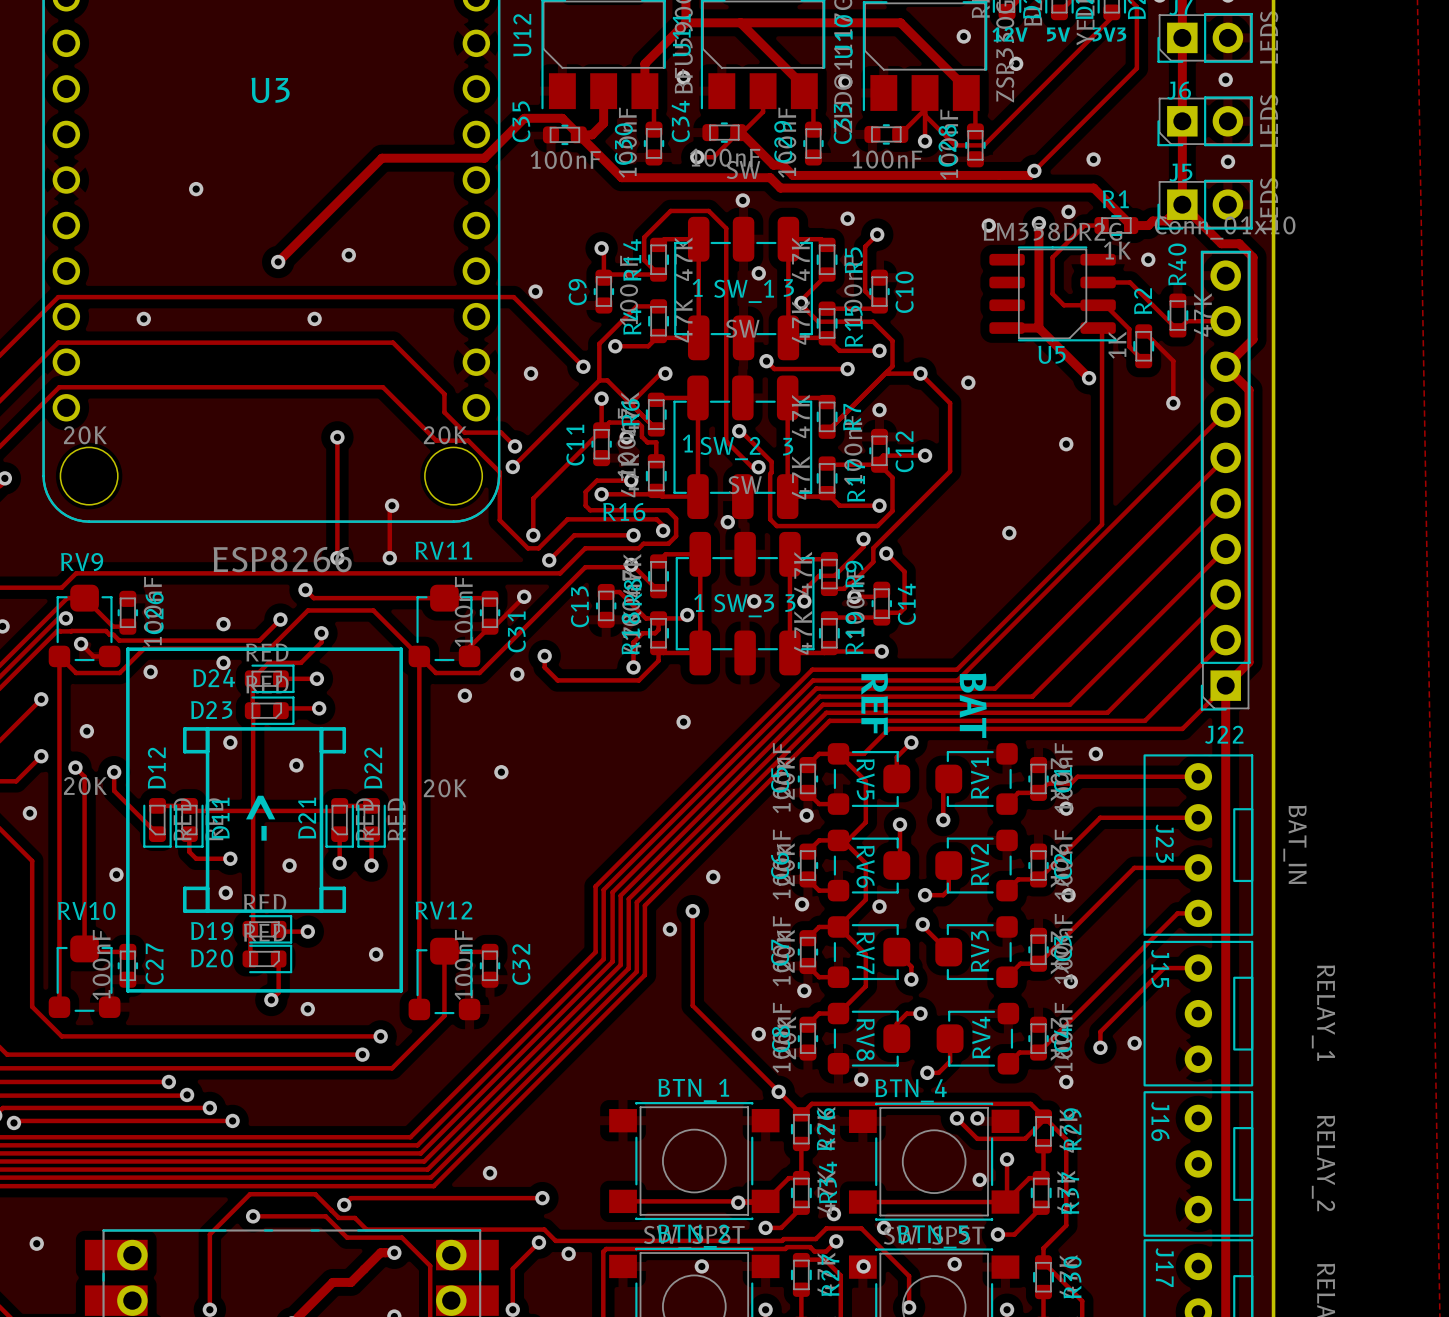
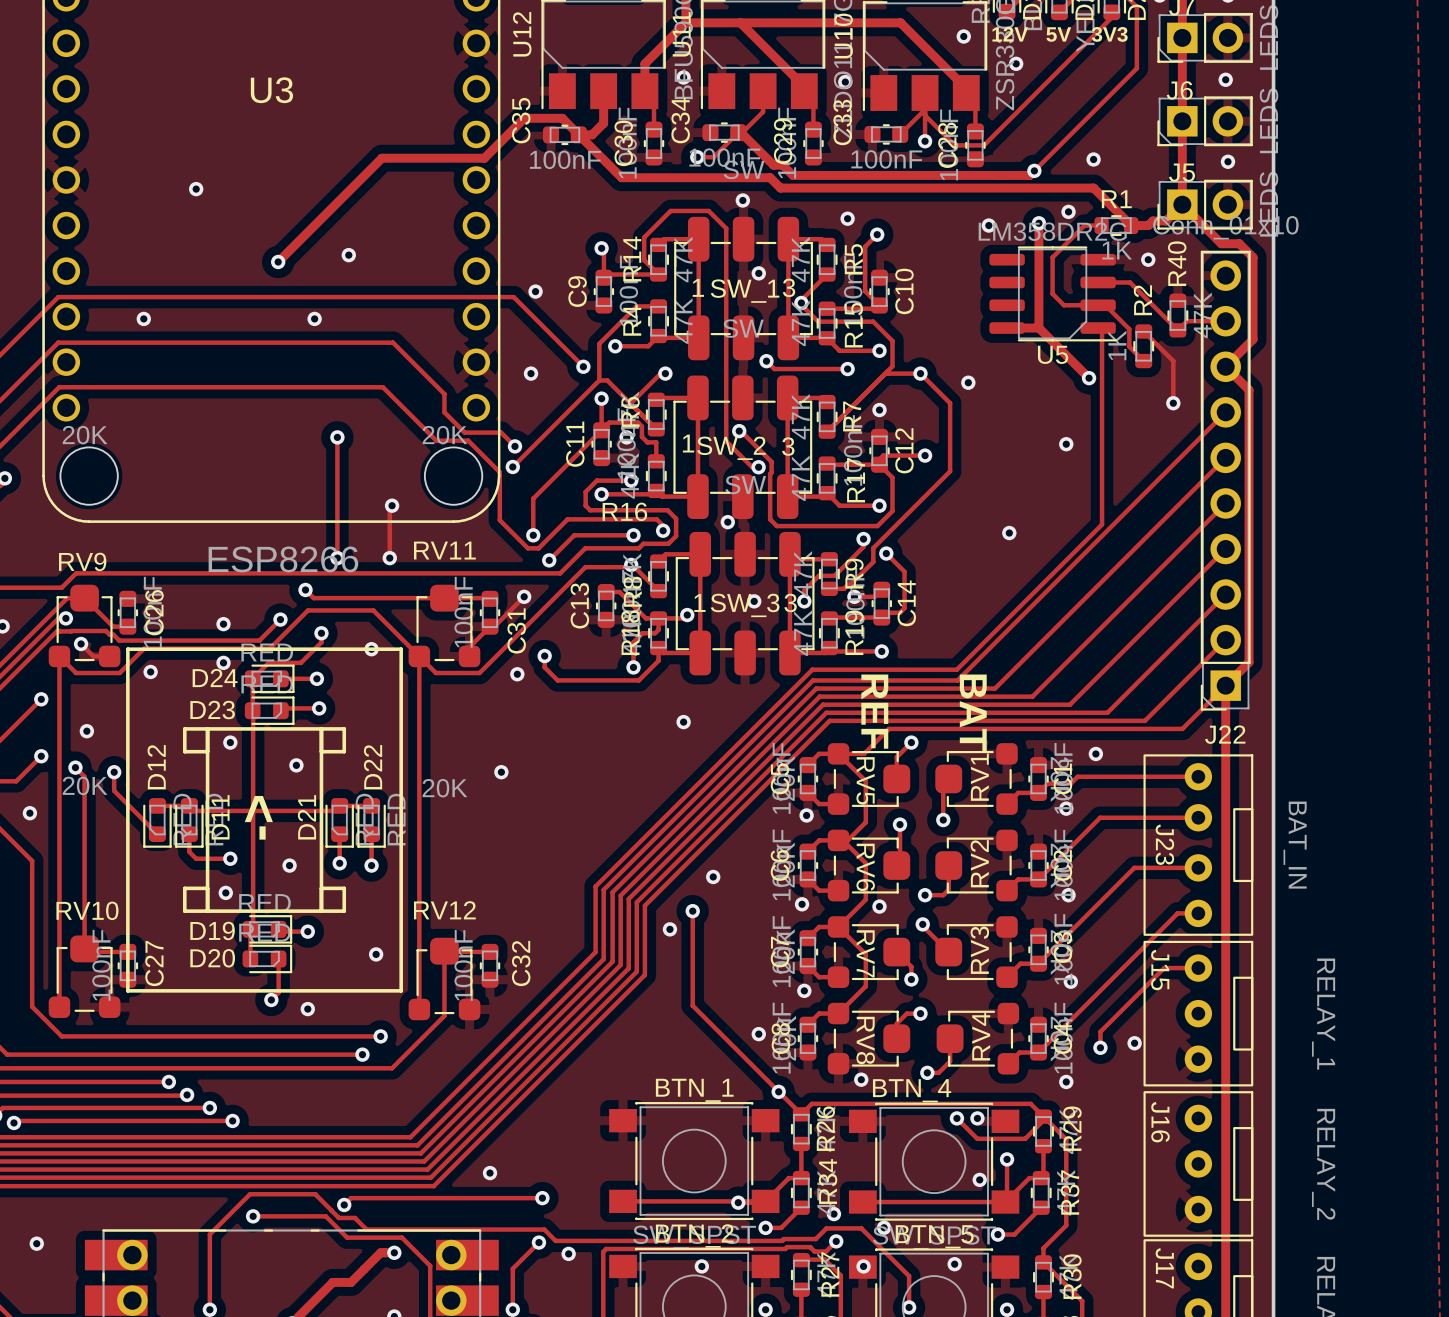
via position: (464, 695) -> (371, 649)
via: (116, 874) -> none

